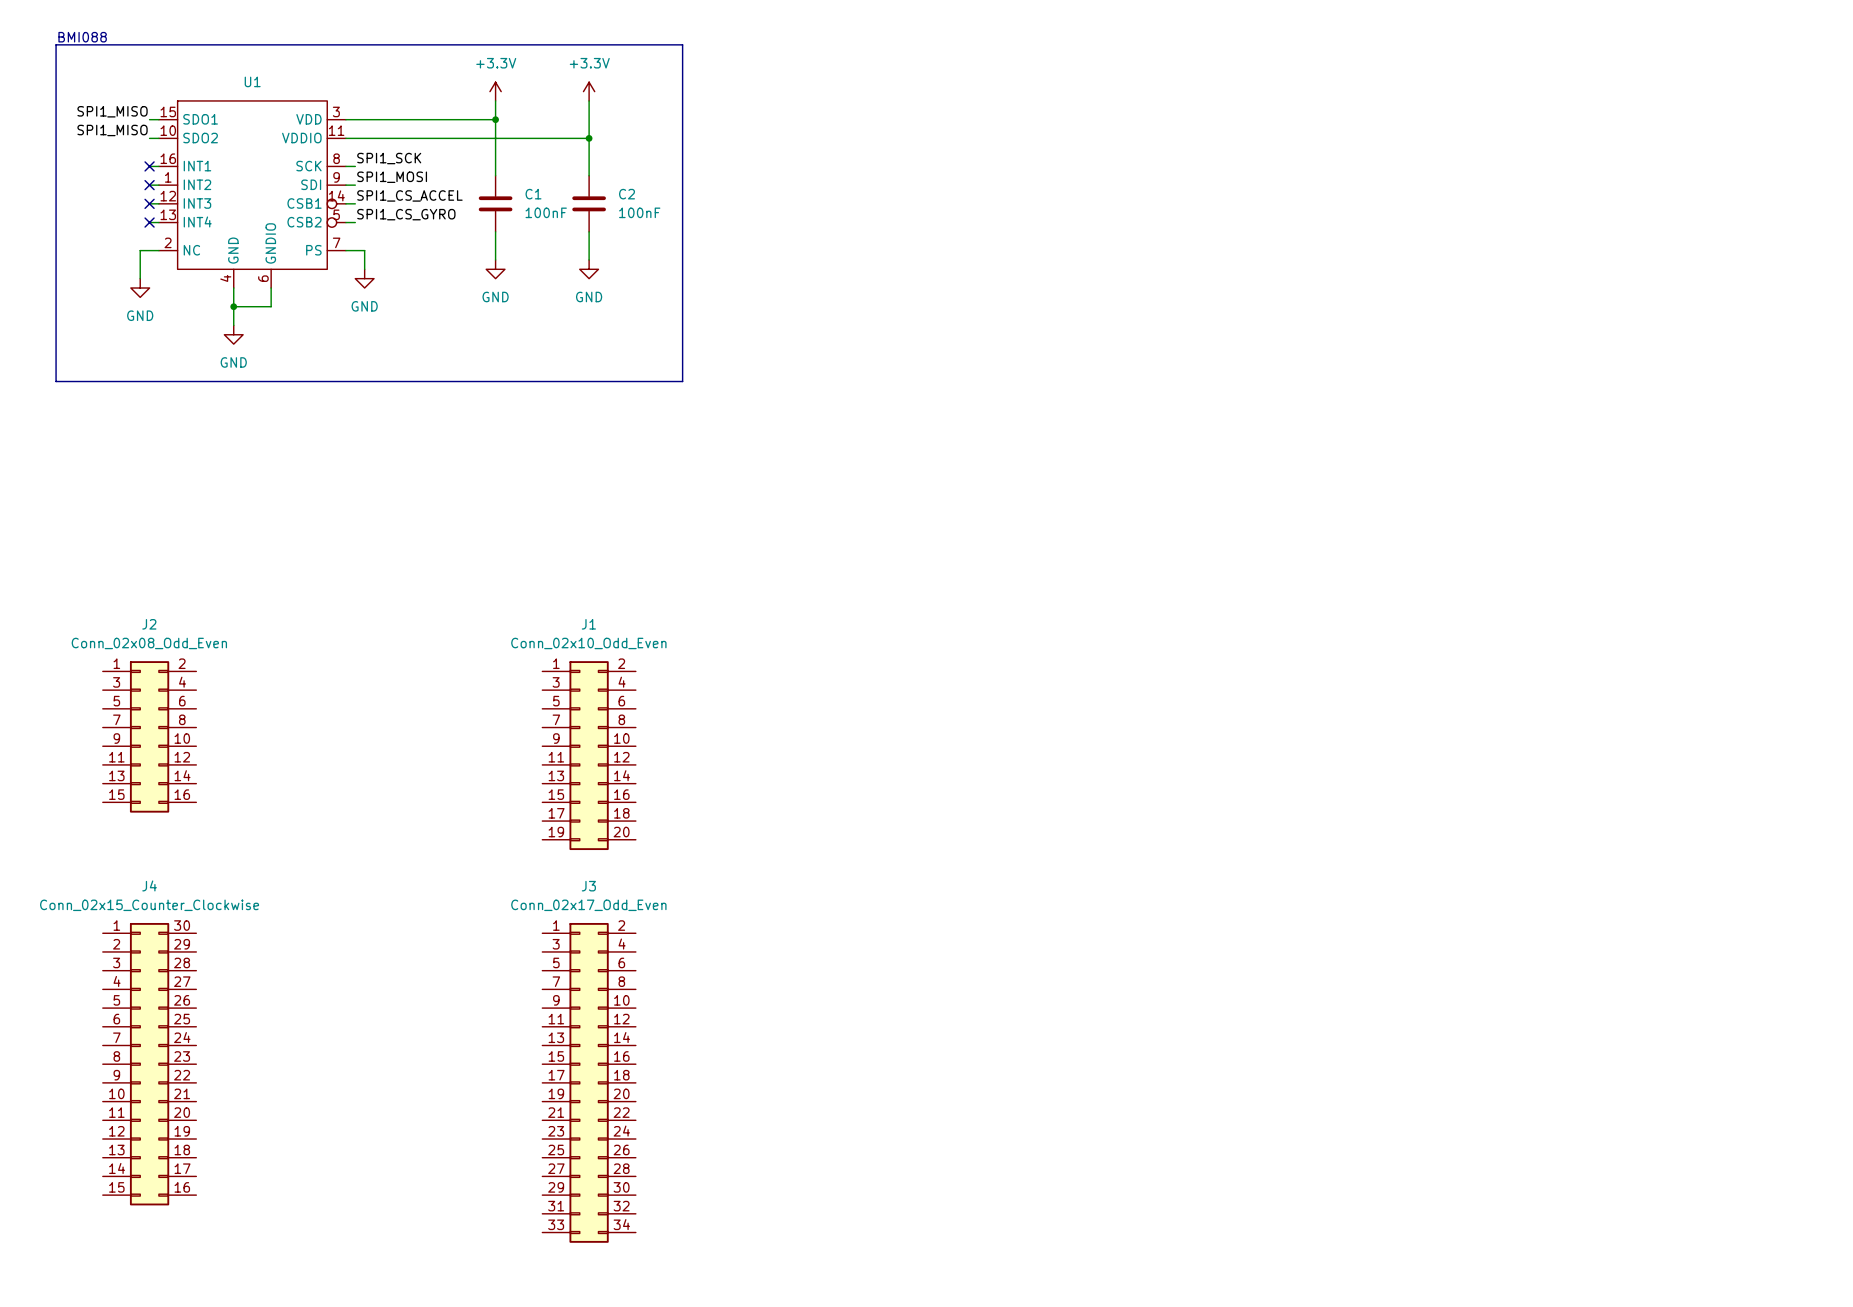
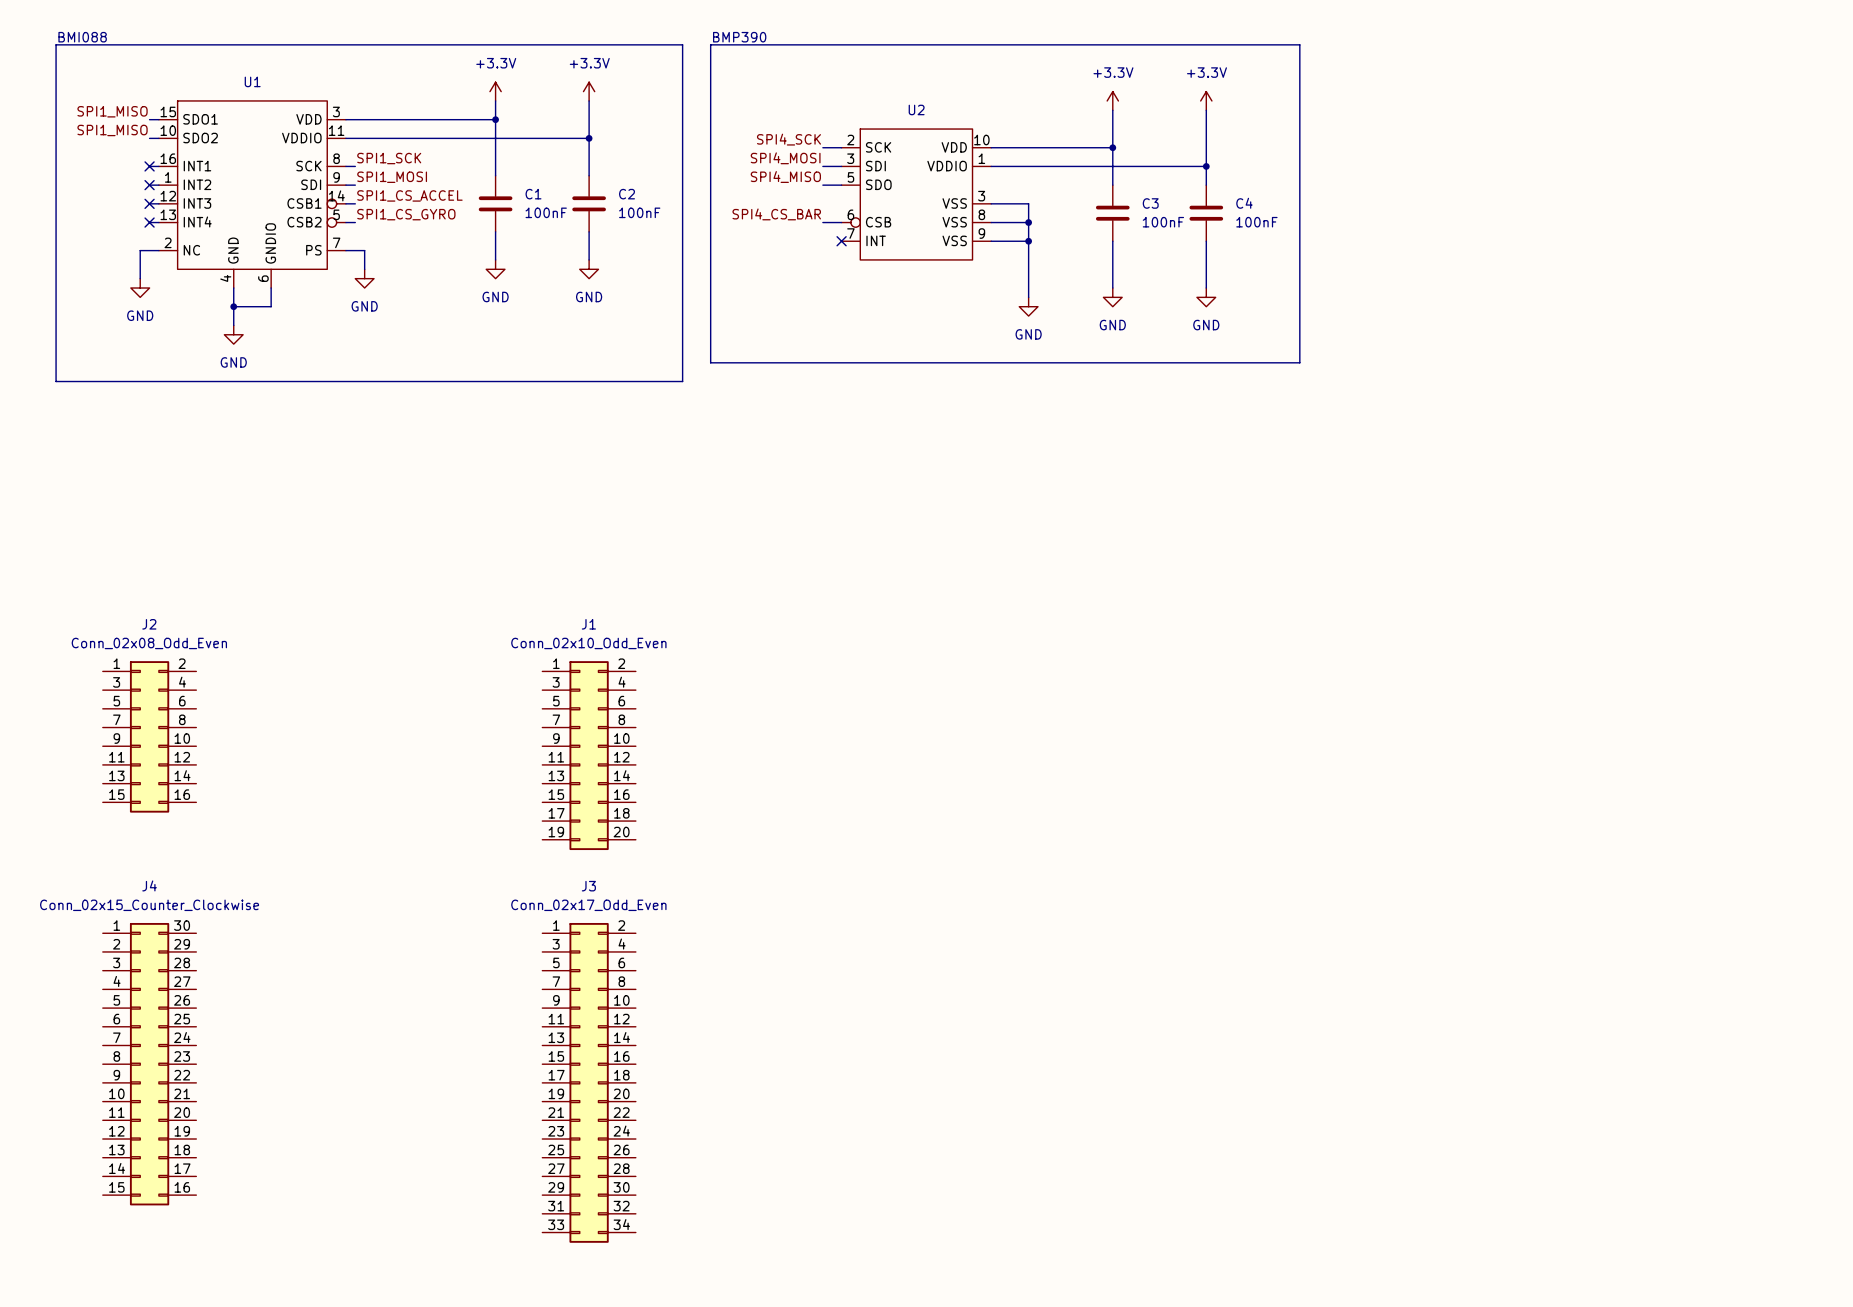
text: none -> BMP390 (739, 37)
line: none -> (710, 44) (1299, 44) (1299, 362) (710, 362) (710, 44)
power symbol: none -> +3.3V (1112, 100)
power symbol: none -> +3.3V (1206, 100)
wire: none -> (1112, 110) (1112, 185)
wire: none -> (1206, 110) (1206, 185)
label: none -> SPI4_SCK (788, 139)
wire: none -> (822, 147) (841, 147)
wire: none -> (991, 147) (1112, 147)
junction: none -> (1112, 147)
label: none -> SPI4_MOSI (785, 158)
wire: none -> (822, 166) (841, 166)
wire: none -> (991, 166) (1206, 166)
junction: none -> (1206, 166)
label: none -> SPI4_MISO (785, 177)
wire: none -> (822, 185) (841, 185)
U2: none -> (916, 194)
wire: none -> (991, 203) (1028, 203) (1028, 297)
C3: none -> 100nF (1112, 213)
C4: none -> 100nF (1206, 213)
label: none -> SPI4_CS_BAR (776, 214)
wire: none -> (822, 222) (841, 222)
wire: none -> (991, 222) (1028, 222)
junction: none -> (1028, 222)
no-connect mark: none -> (841, 241)
wire: none -> (991, 241) (1028, 241)
junction: none -> (1028, 241)
wire: none -> (1112, 241) (1112, 288)
wire: none -> (1206, 241) (1206, 288)
power symbol: none -> GND (1112, 297)
power symbol: none -> GND (1206, 297)
power symbol: none -> GND (1028, 306)

